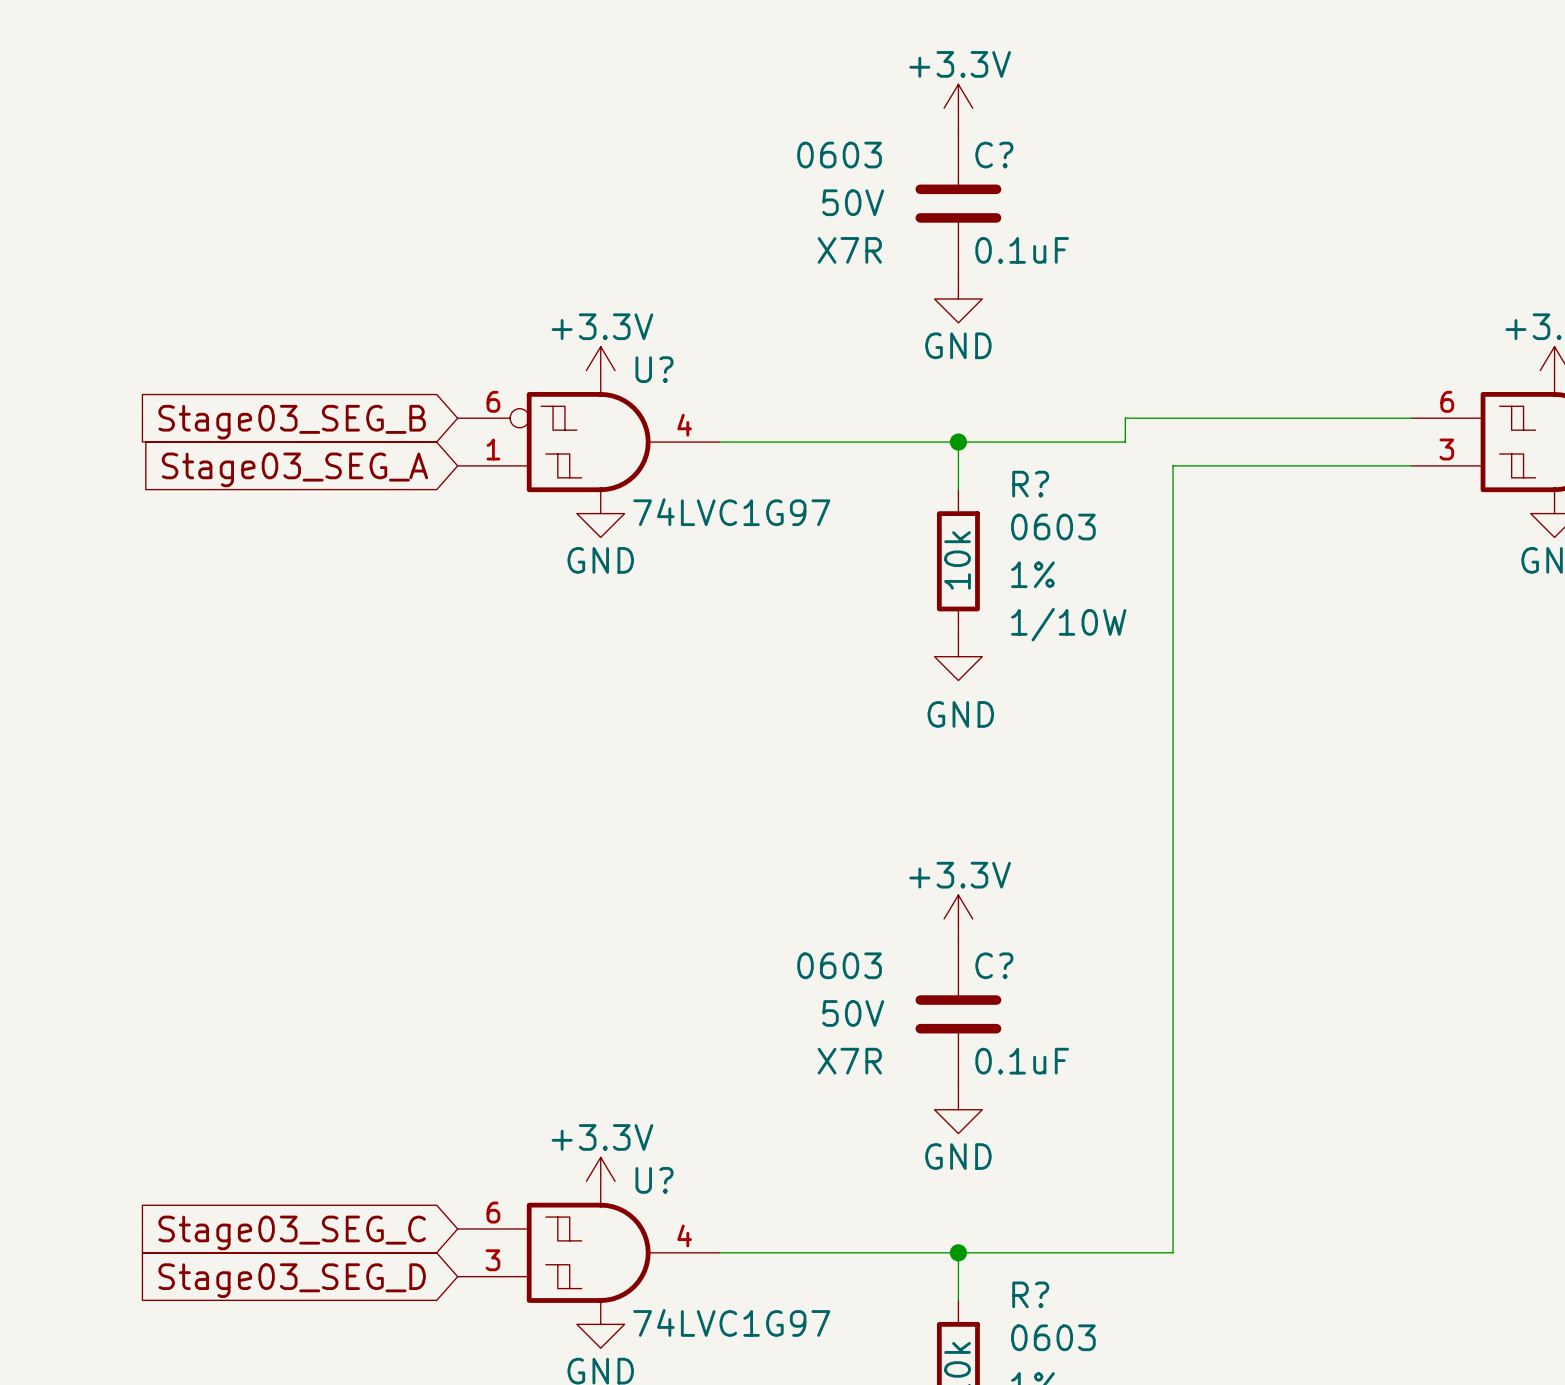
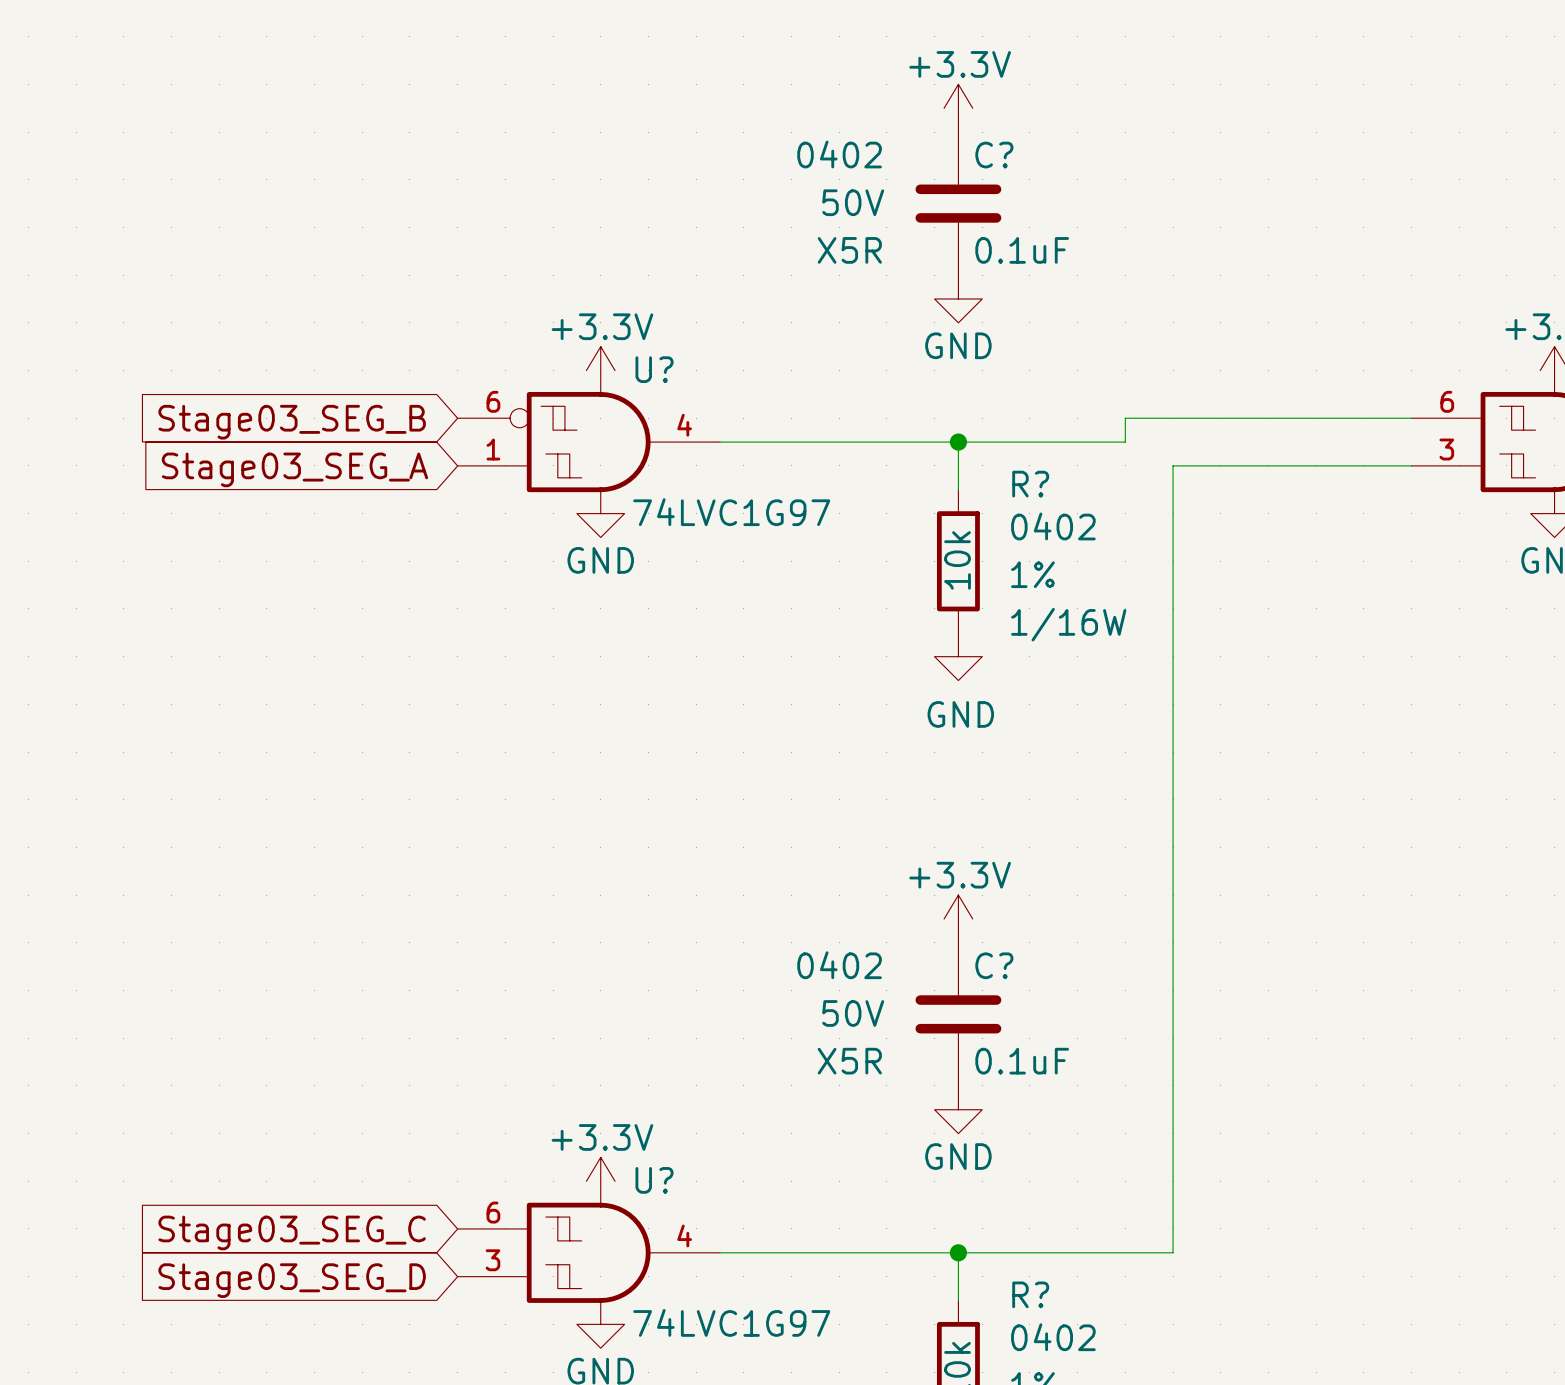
C? text: 0603 (839, 155) -> 0402 (839, 154)
C? text: X7R (849, 250) -> X5R (849, 250)
R? text: 0603 (1053, 527) -> 0402 (1053, 526)
R? text: 1/10W (1068, 624) -> 1/16W (1068, 624)
C? text: 0603 (839, 965) -> 0402 (839, 965)
C? text: X7R (849, 1061) -> X5R (849, 1061)
R? text: 0603 (1053, 1337) -> 0402 (1053, 1337)

